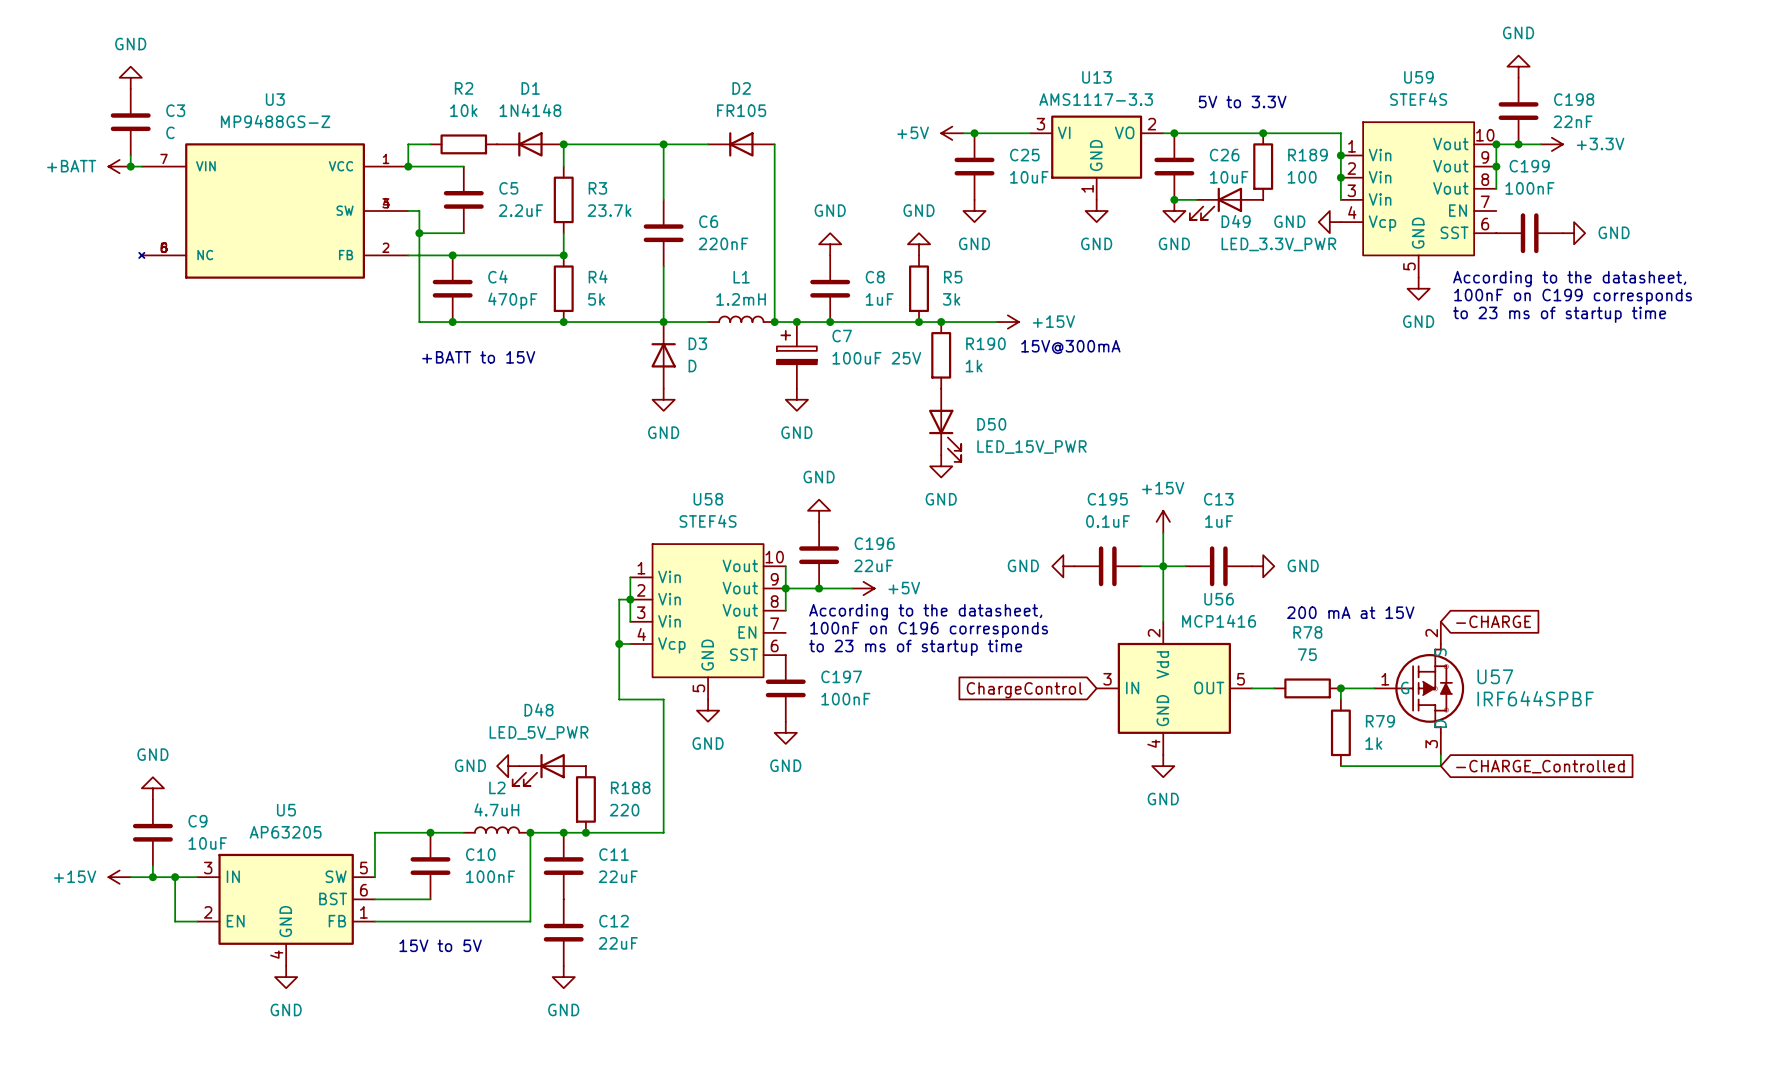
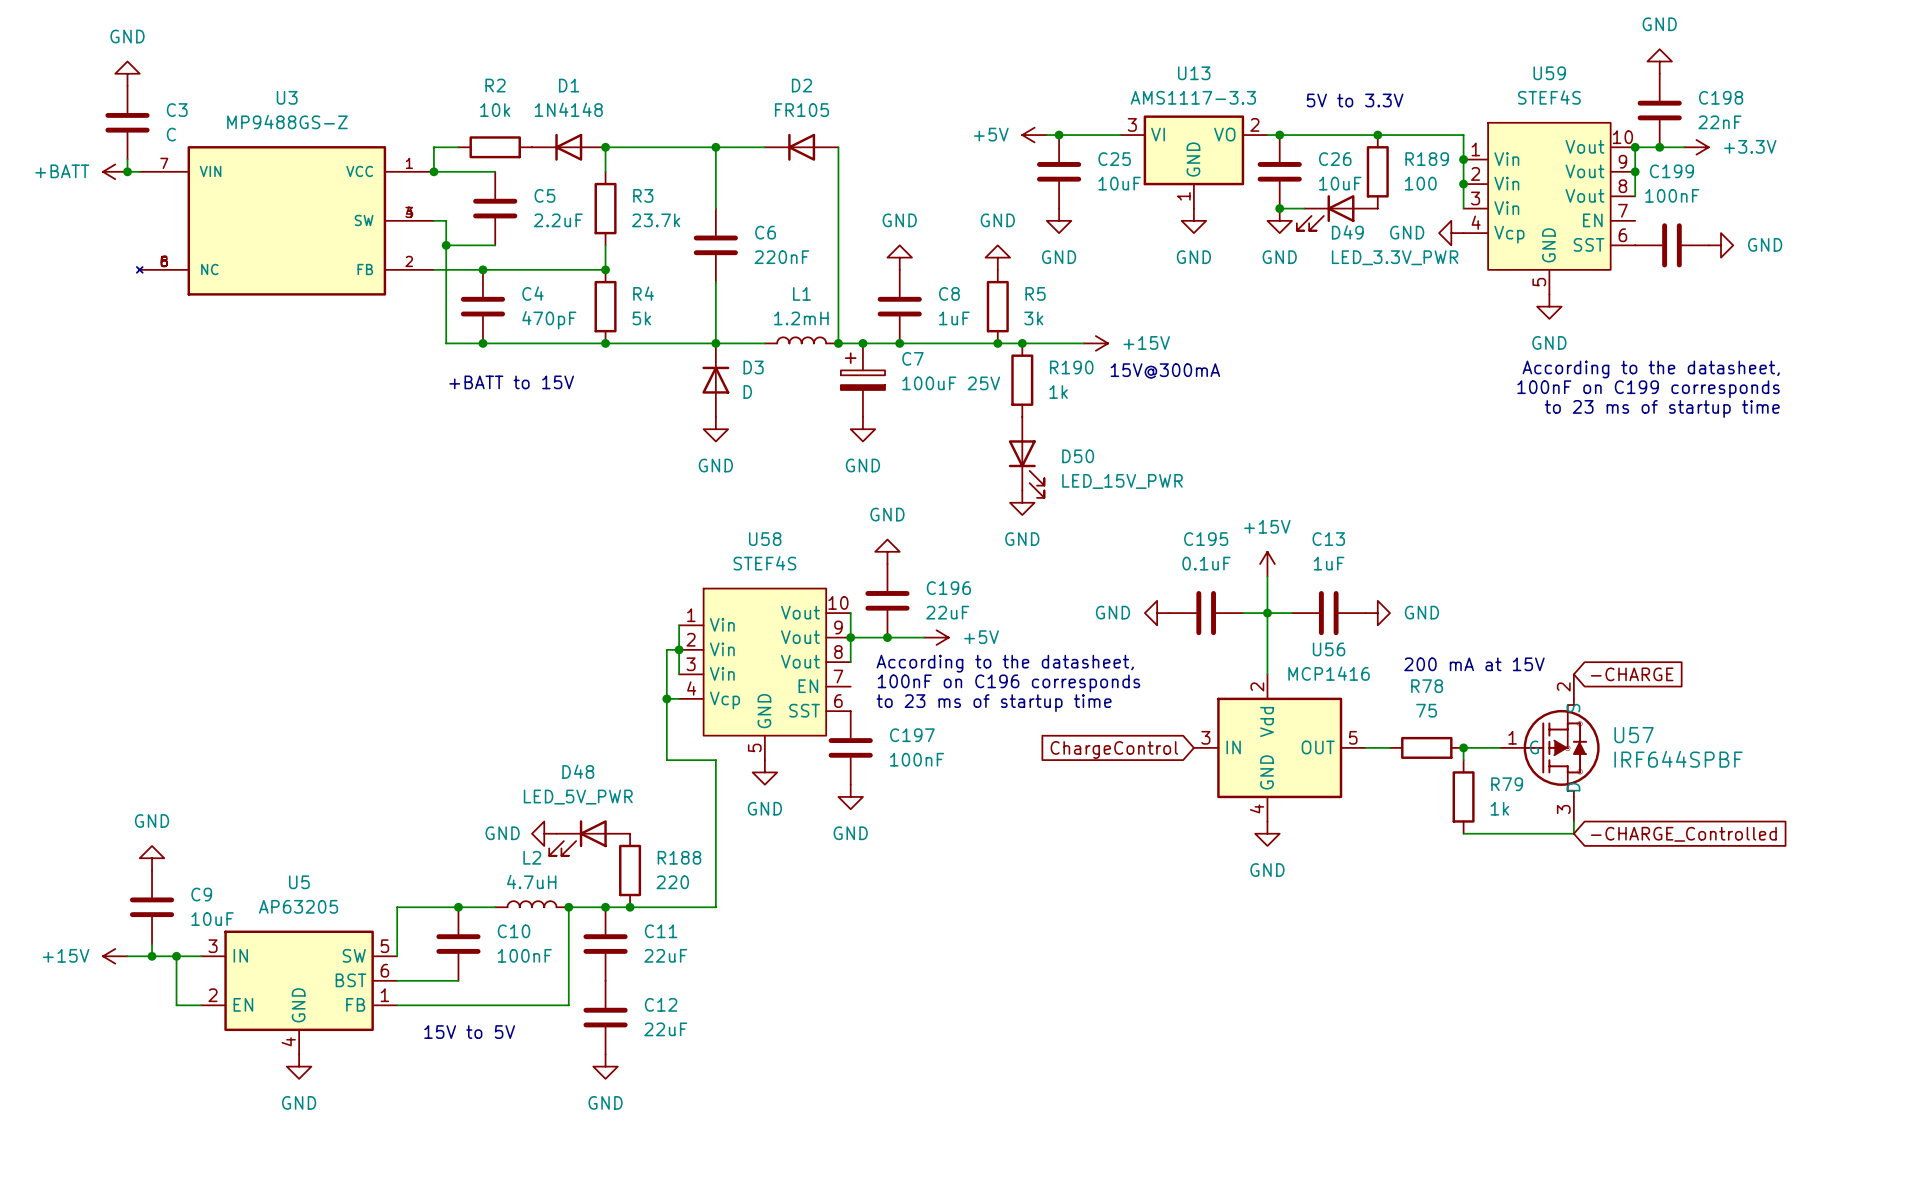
text position: According to the datasheet, (1569, 279) -> According to the datasheet, (1651, 369)
text position: 100nF on C199 corresponds (1573, 296) -> 100nF on C199 corresponds (1648, 389)
text position: to 23 ms of startup time (1559, 314) -> to 23 ms of startup time (1662, 408)

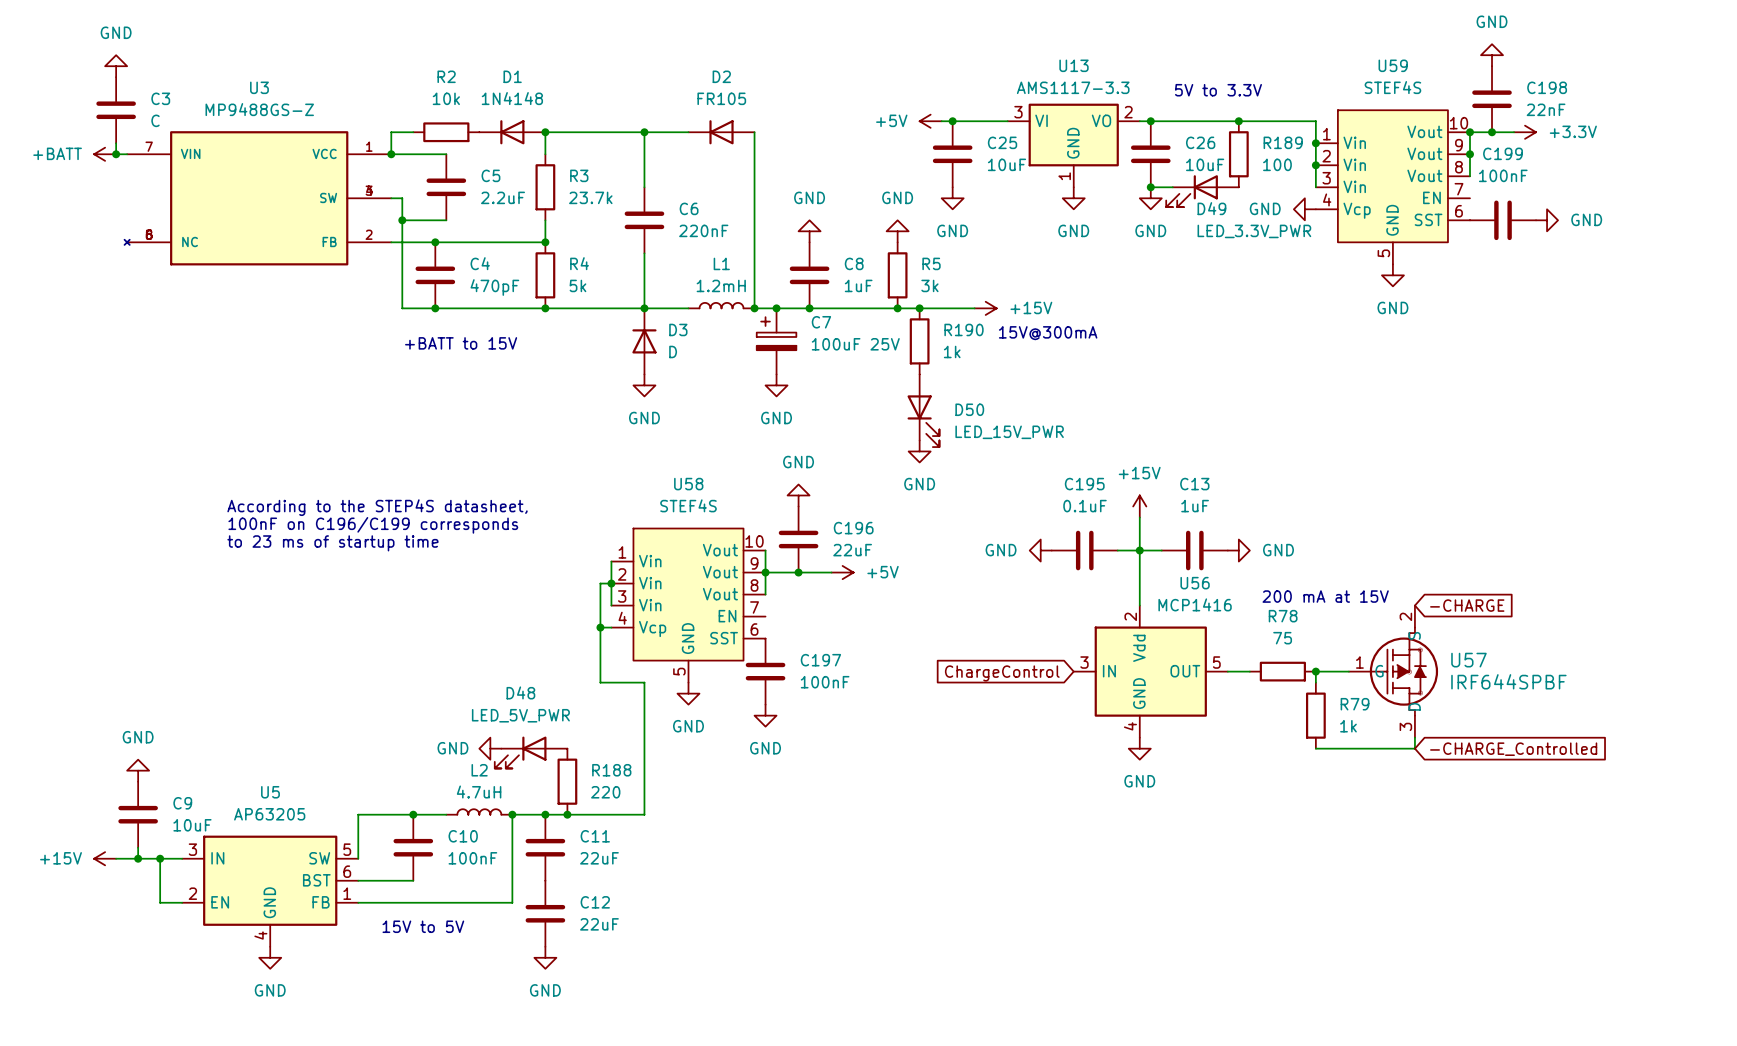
text: According to the datasheet, (1651, 369) -> none
text: 100nF on C199 corresponds (1648, 389) -> none
text: to 23 ms of startup time (1662, 408) -> none
text: none -> According to the STEP4S datasheet, (377, 507)
text: none -> 100nF on C196/C199 corresponds (373, 525)
text: none -> to 23 ms of startup time (332, 543)
text: According to the datasheet, (1005, 663) -> none
text: 100nF on C196 corresponds (1008, 683) -> none
text: to 23 ms of startup time (994, 703) -> none

